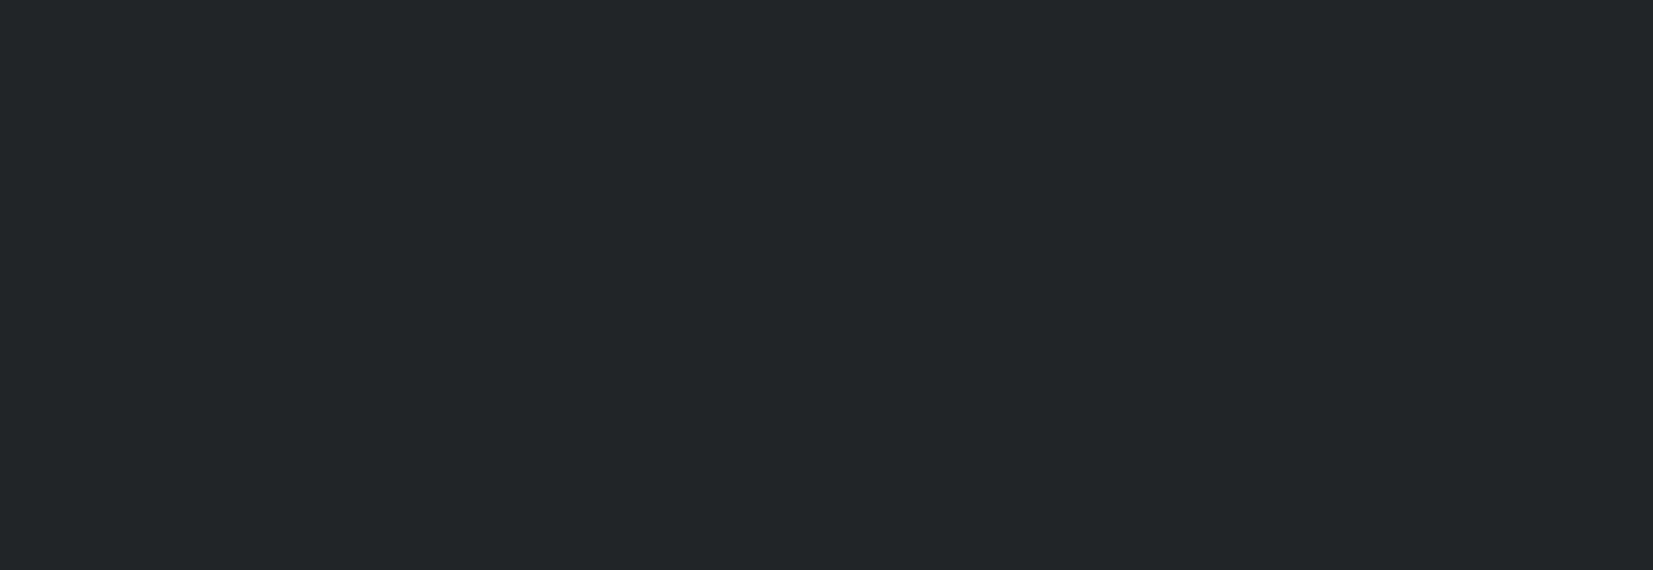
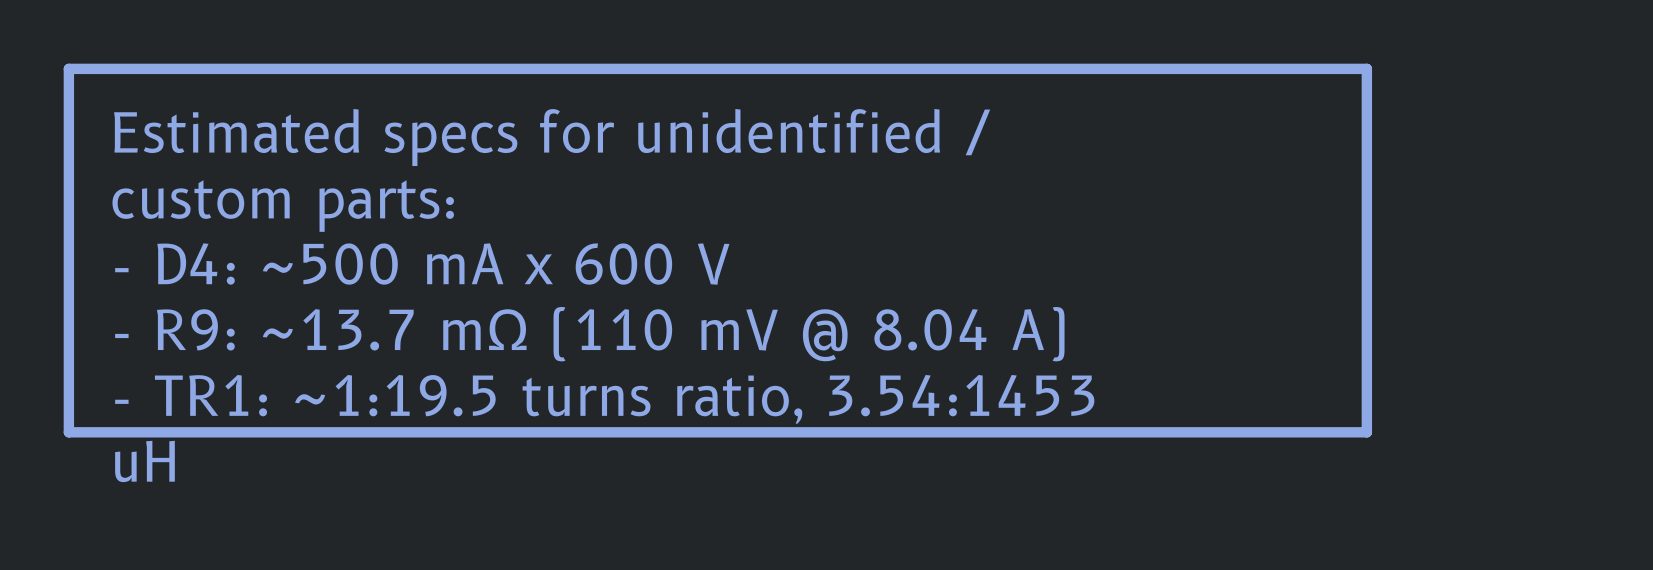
line: none -> (68, 68) (1366, 68) (1366, 432) (68, 432) (68, 68)
text: none -> Estimated specs for unidentified / (552, 137)
text: none -> custom parts: (283, 206)
text: none -> - D4: ~500 mA x 600 V (422, 264)
text: none -> - R9: ~13.7 mΩ (110 mV @ 8.04 A) (589, 334)
text: none -> - TR1: ~1:19.5 turns ratio, 3.54:1453 (604, 399)
text: none -> uH (144, 461)

